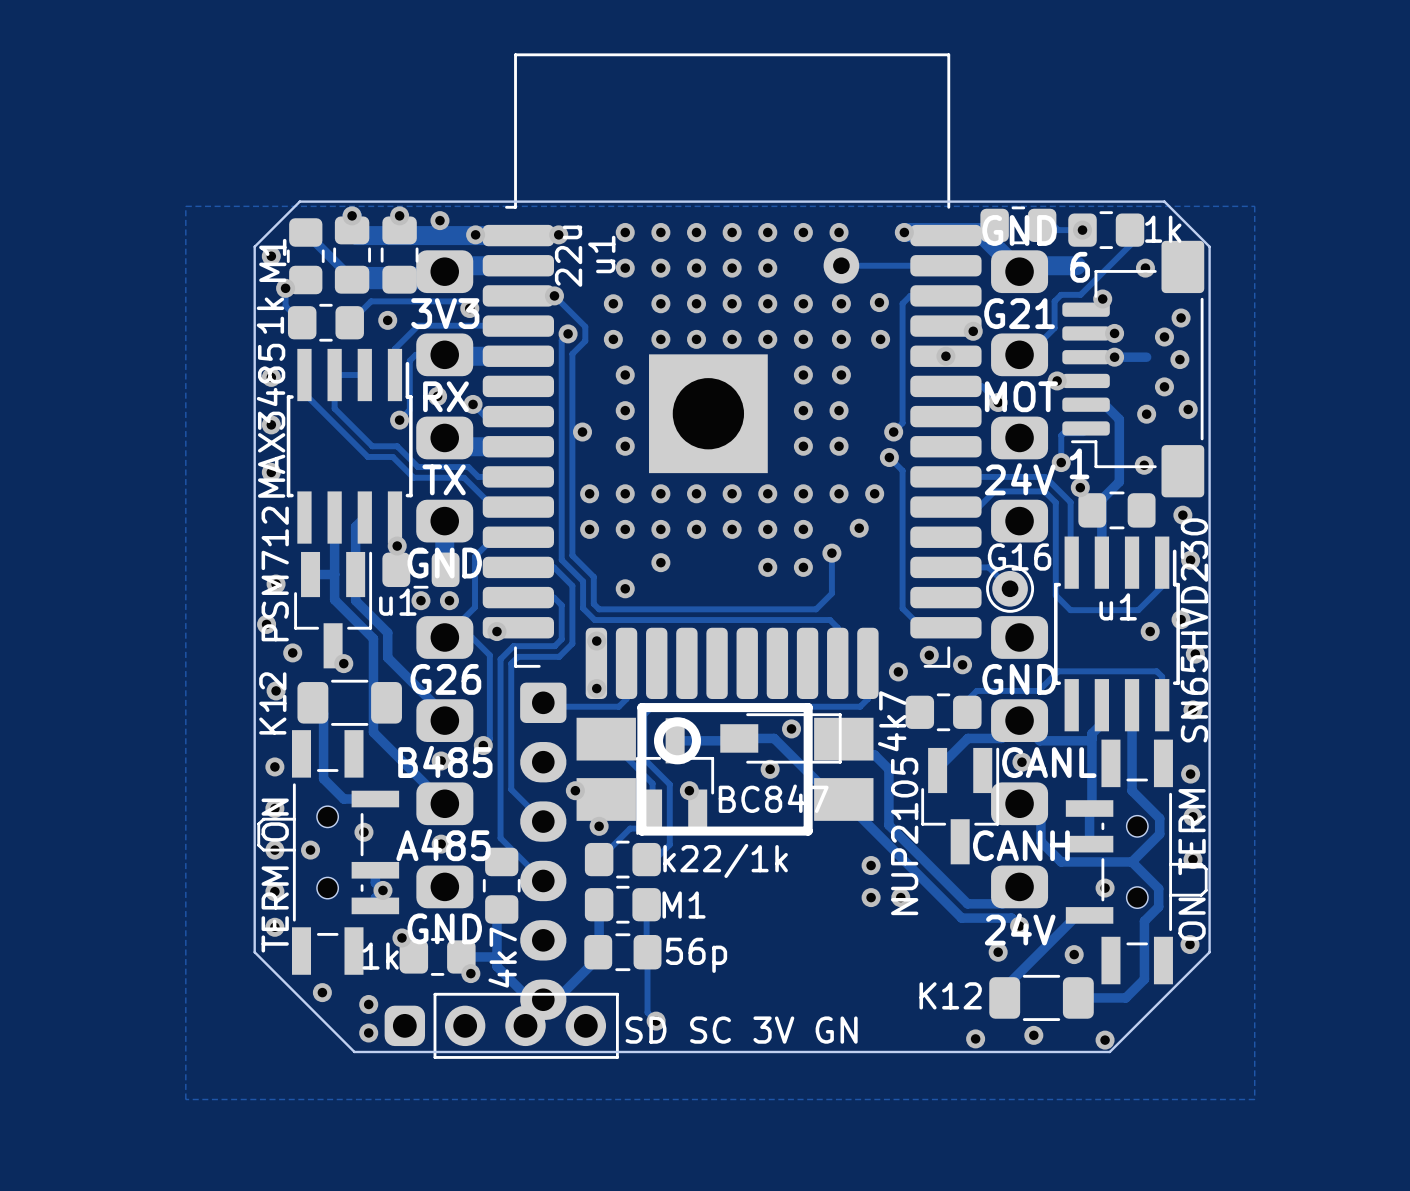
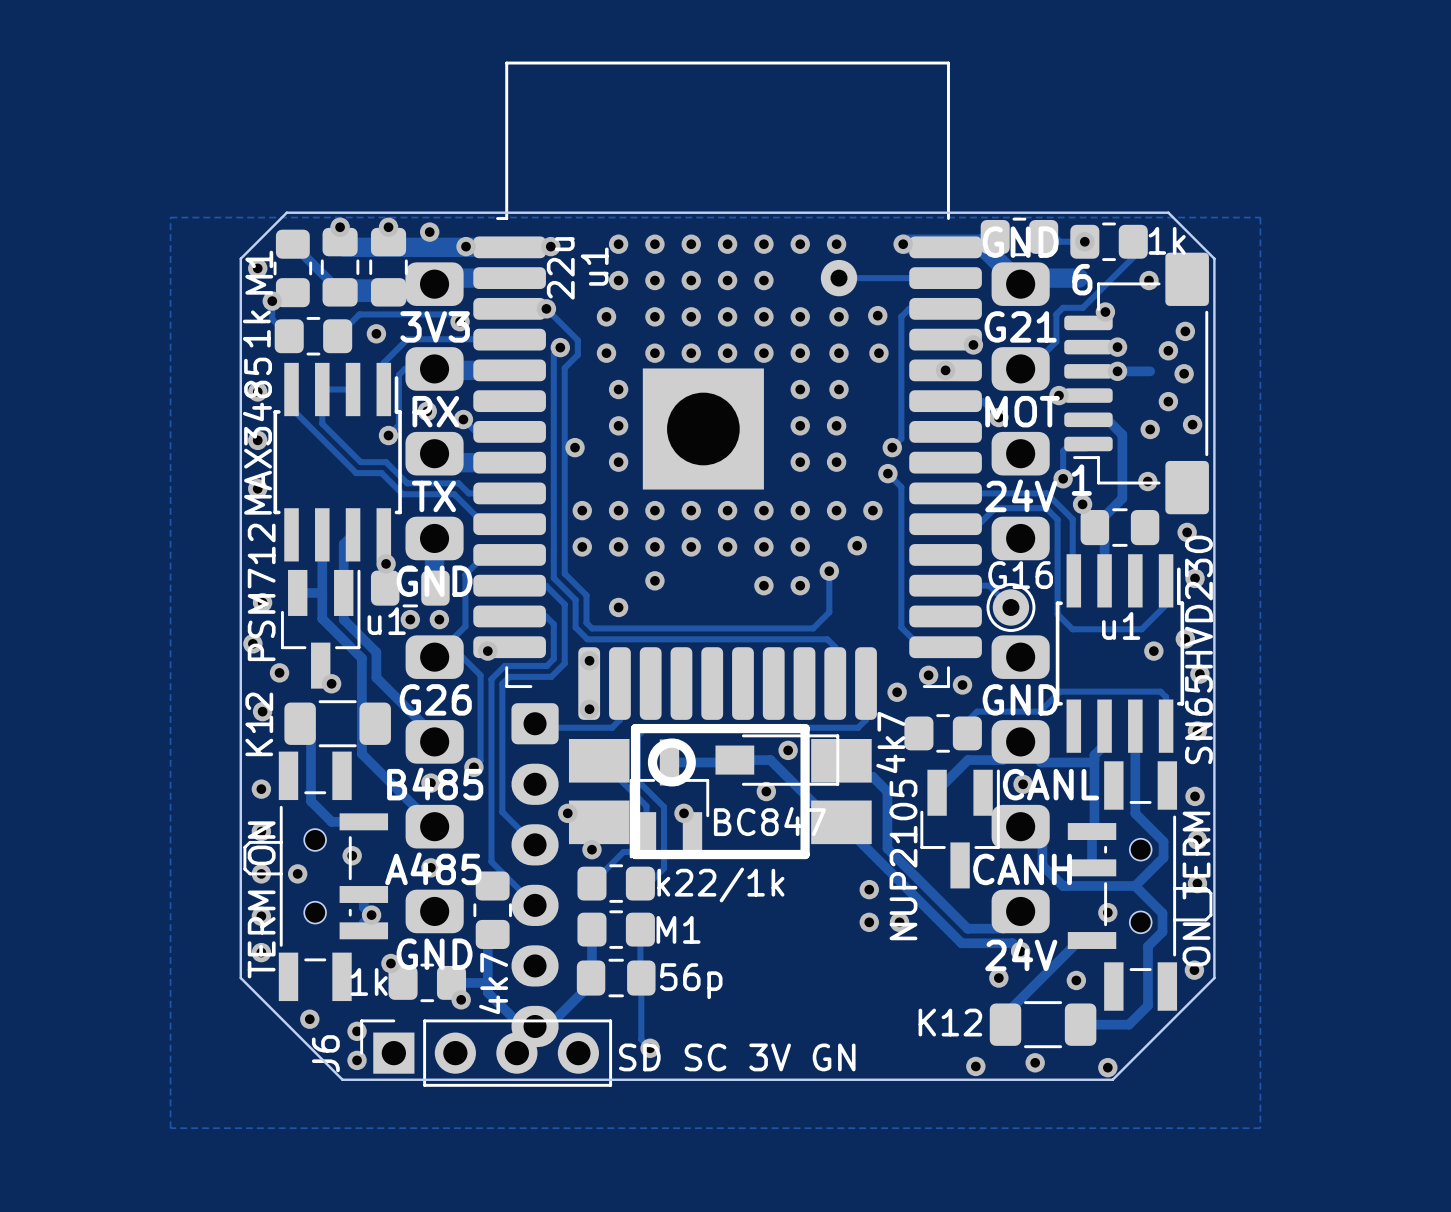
J6: none -> (486, 1053)
part: (501, 1025) -> none

